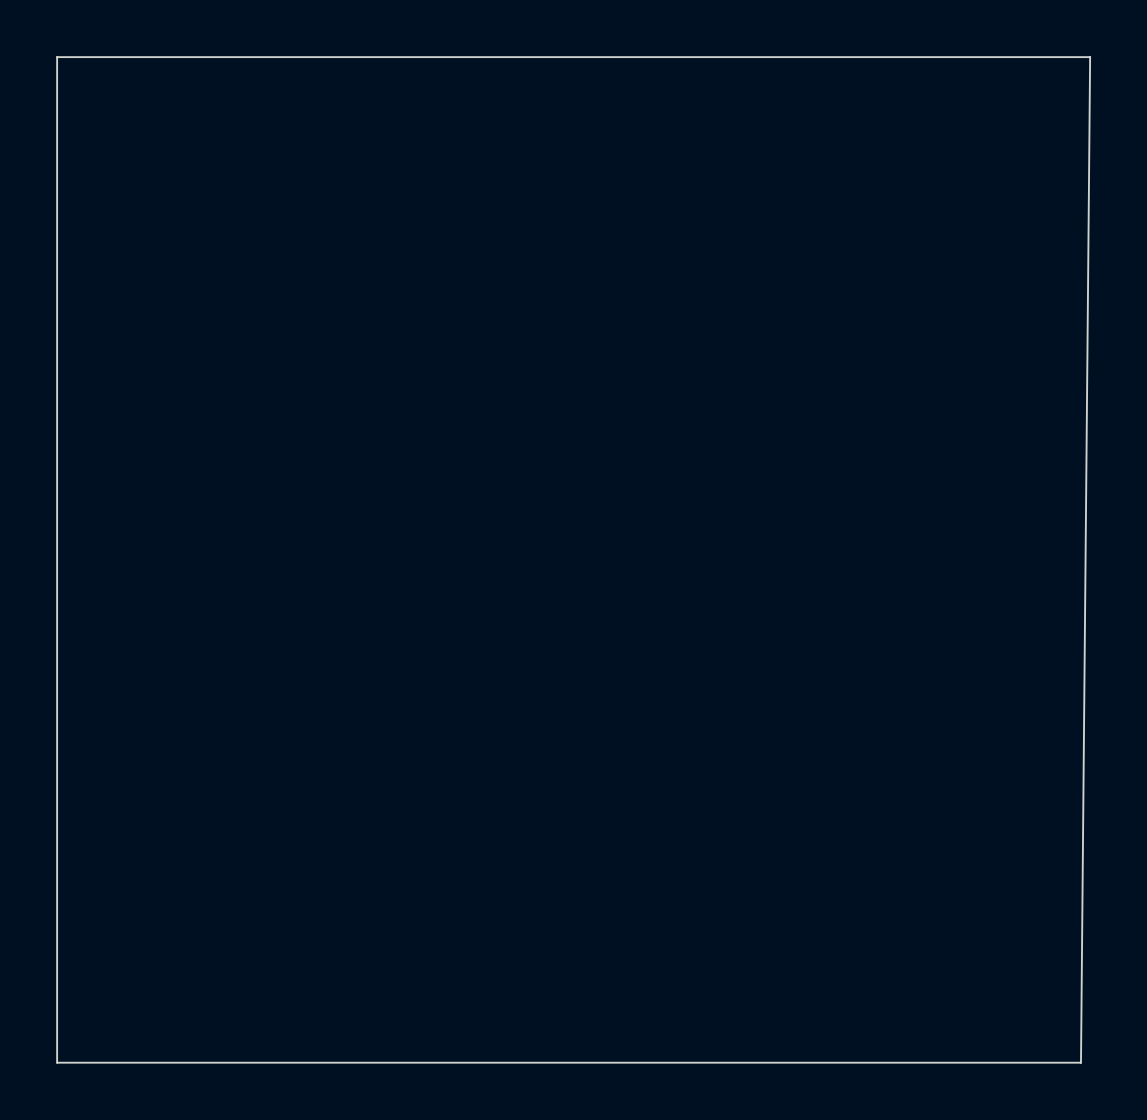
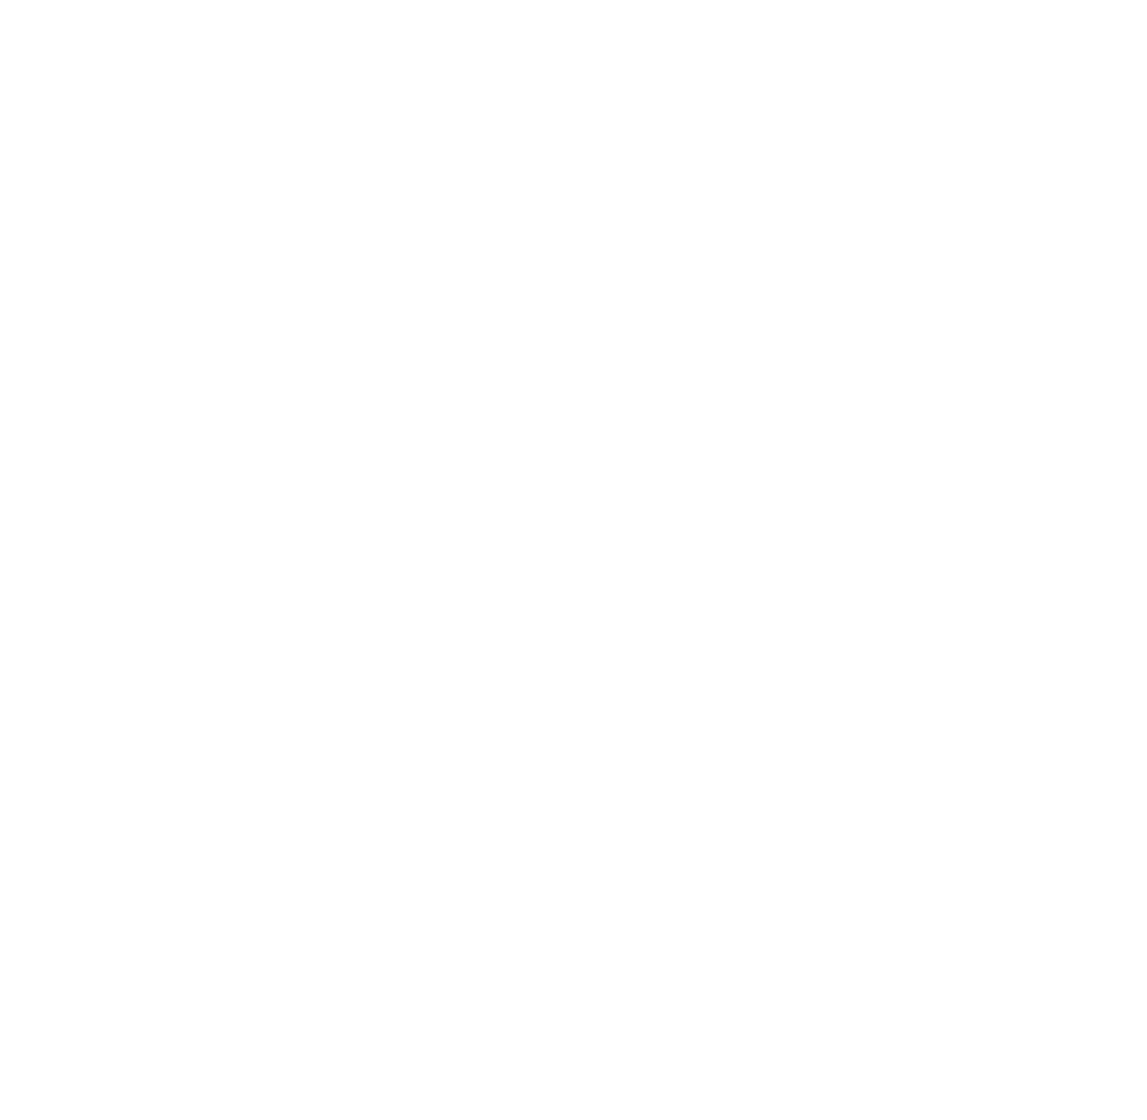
board edge: (1090, 57) (57, 57) (57, 1062) (1080, 1062) (1090, 57) -> none

